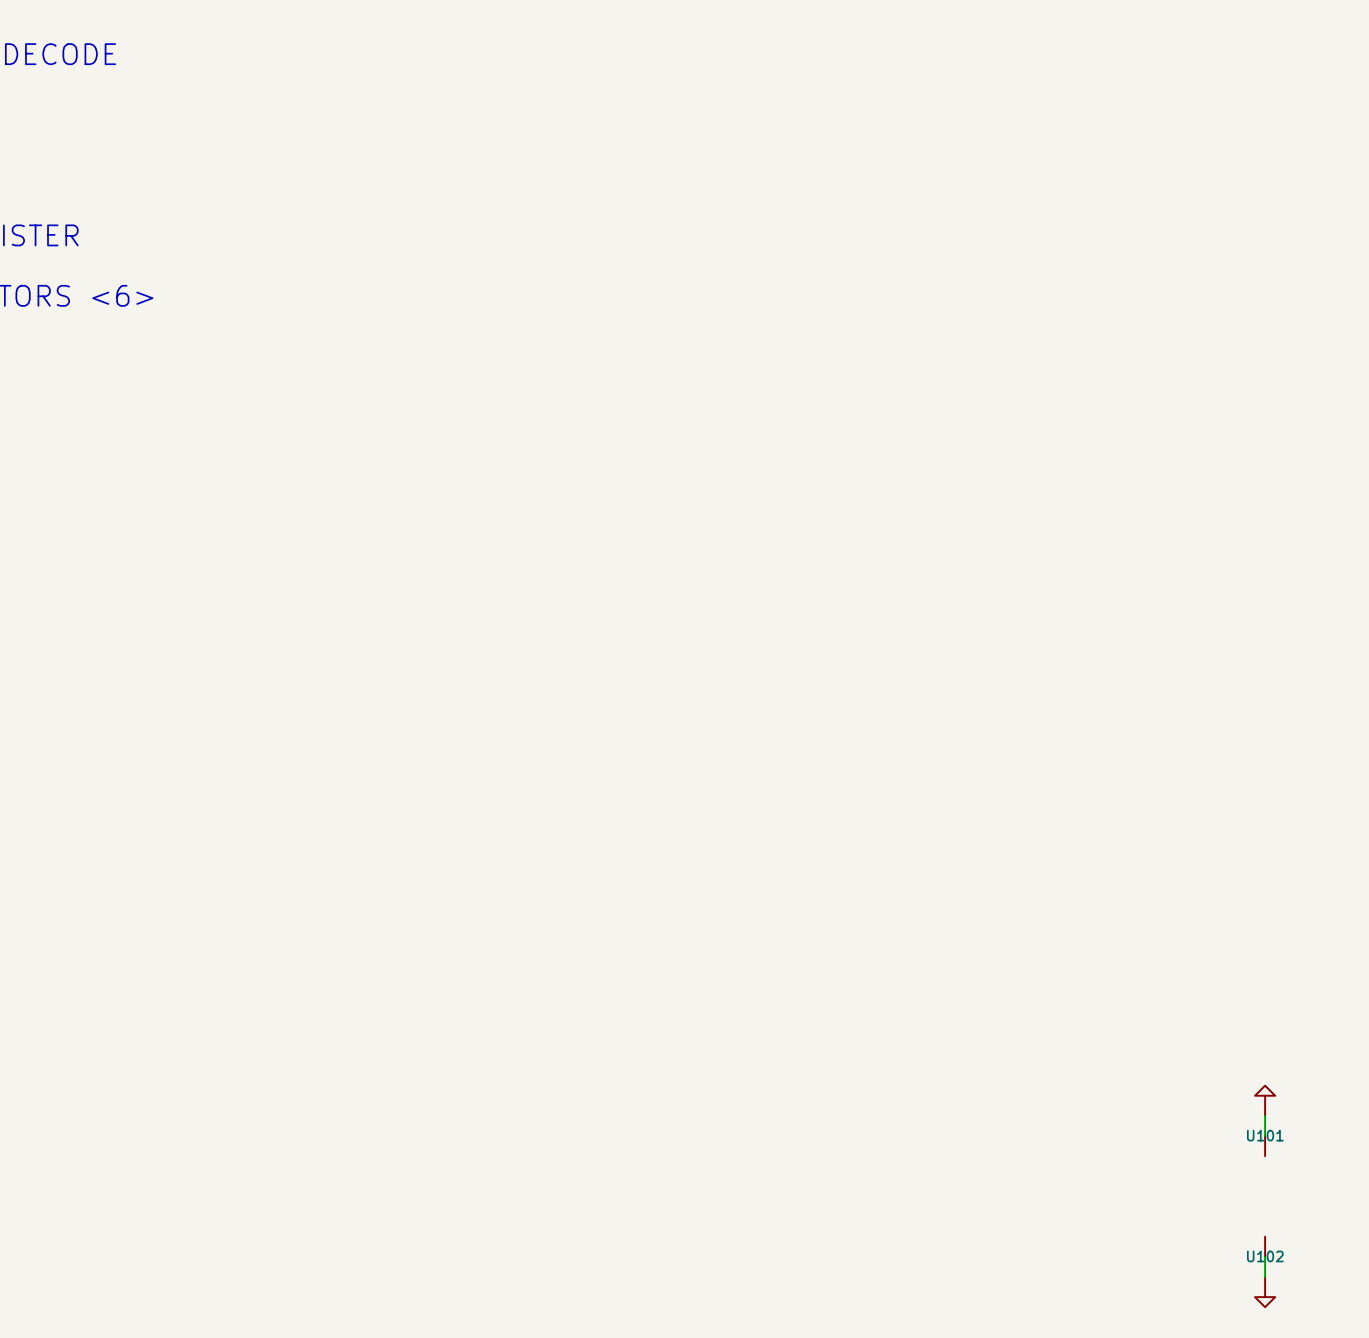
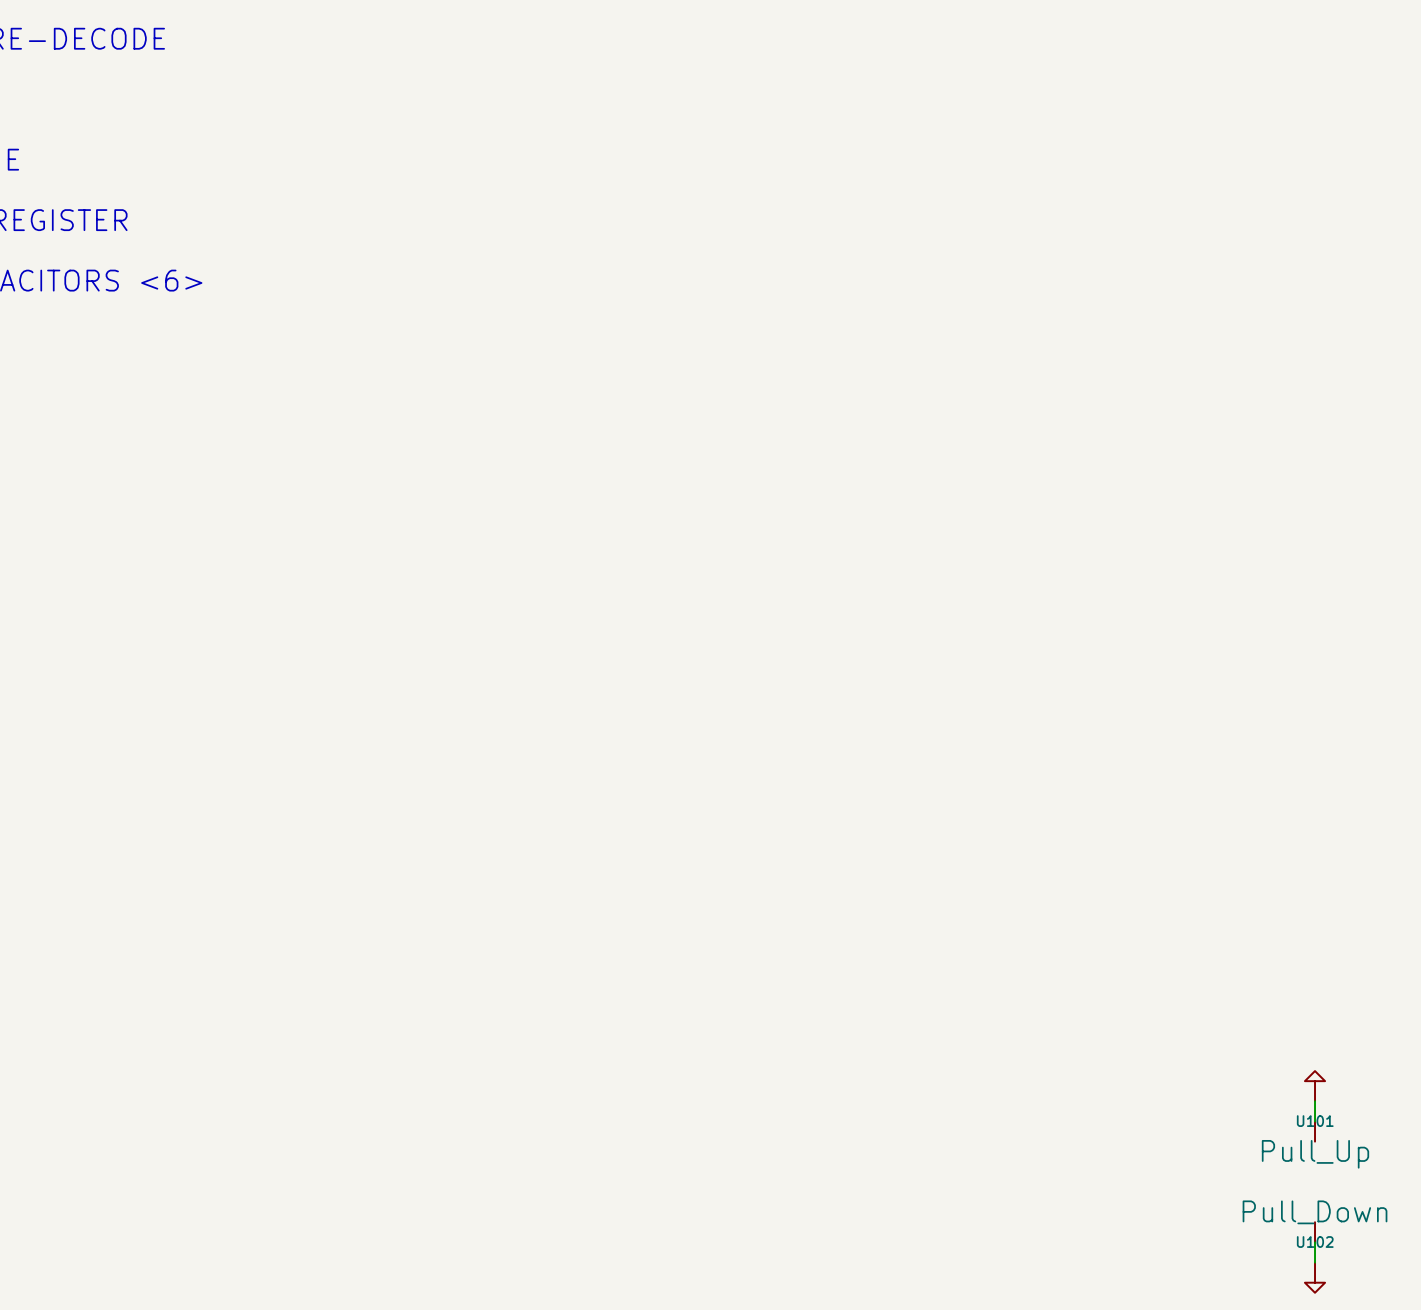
U101 value: none -> Pull_Up (1315, 1154)
U102 value: none -> Pull_Down (1315, 1212)

